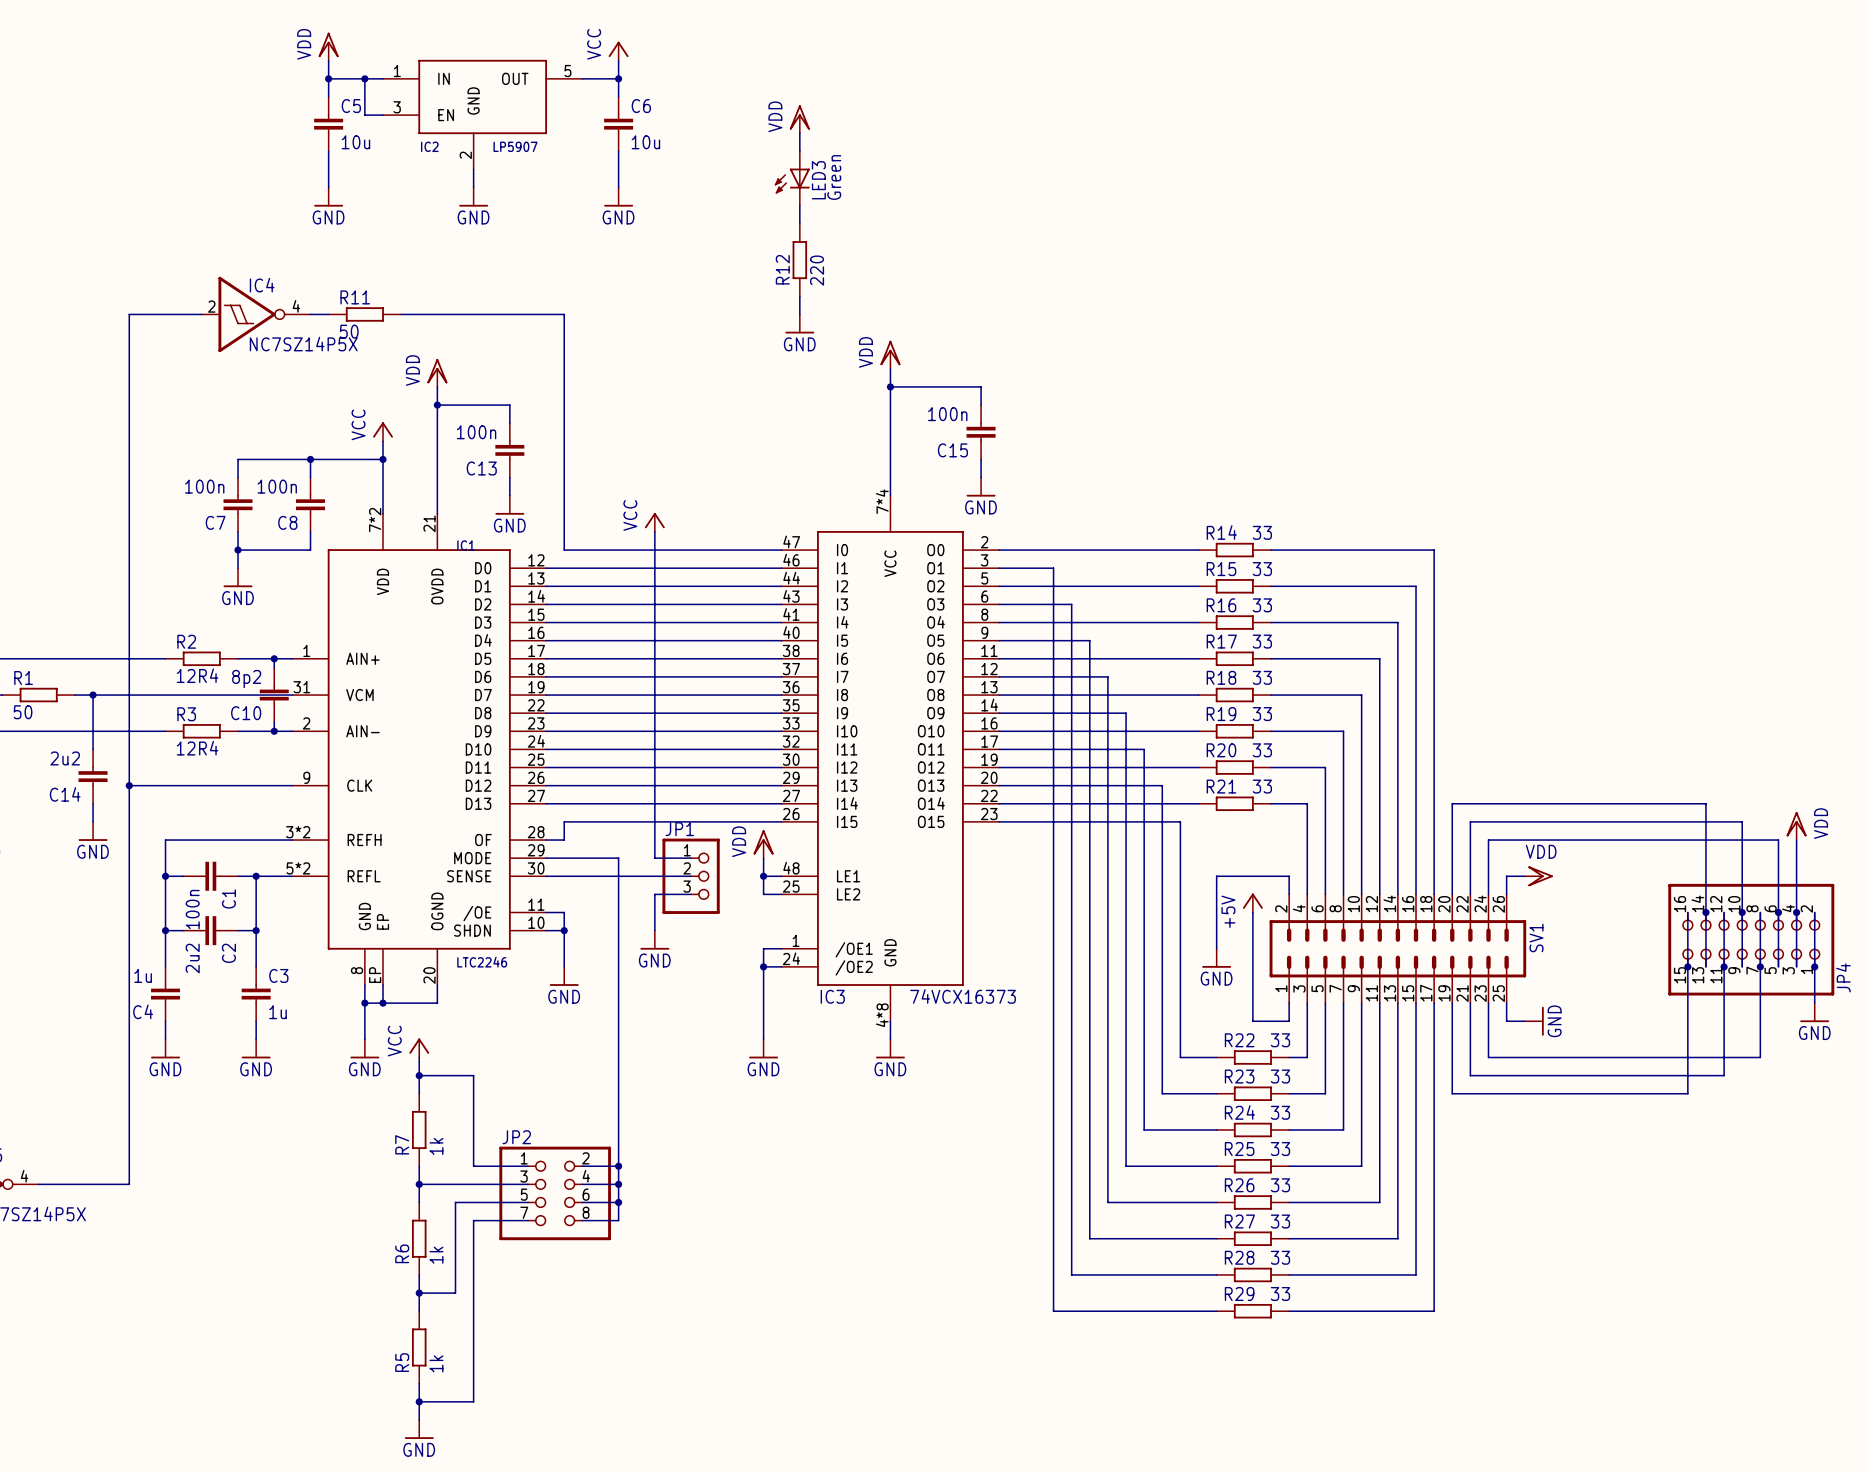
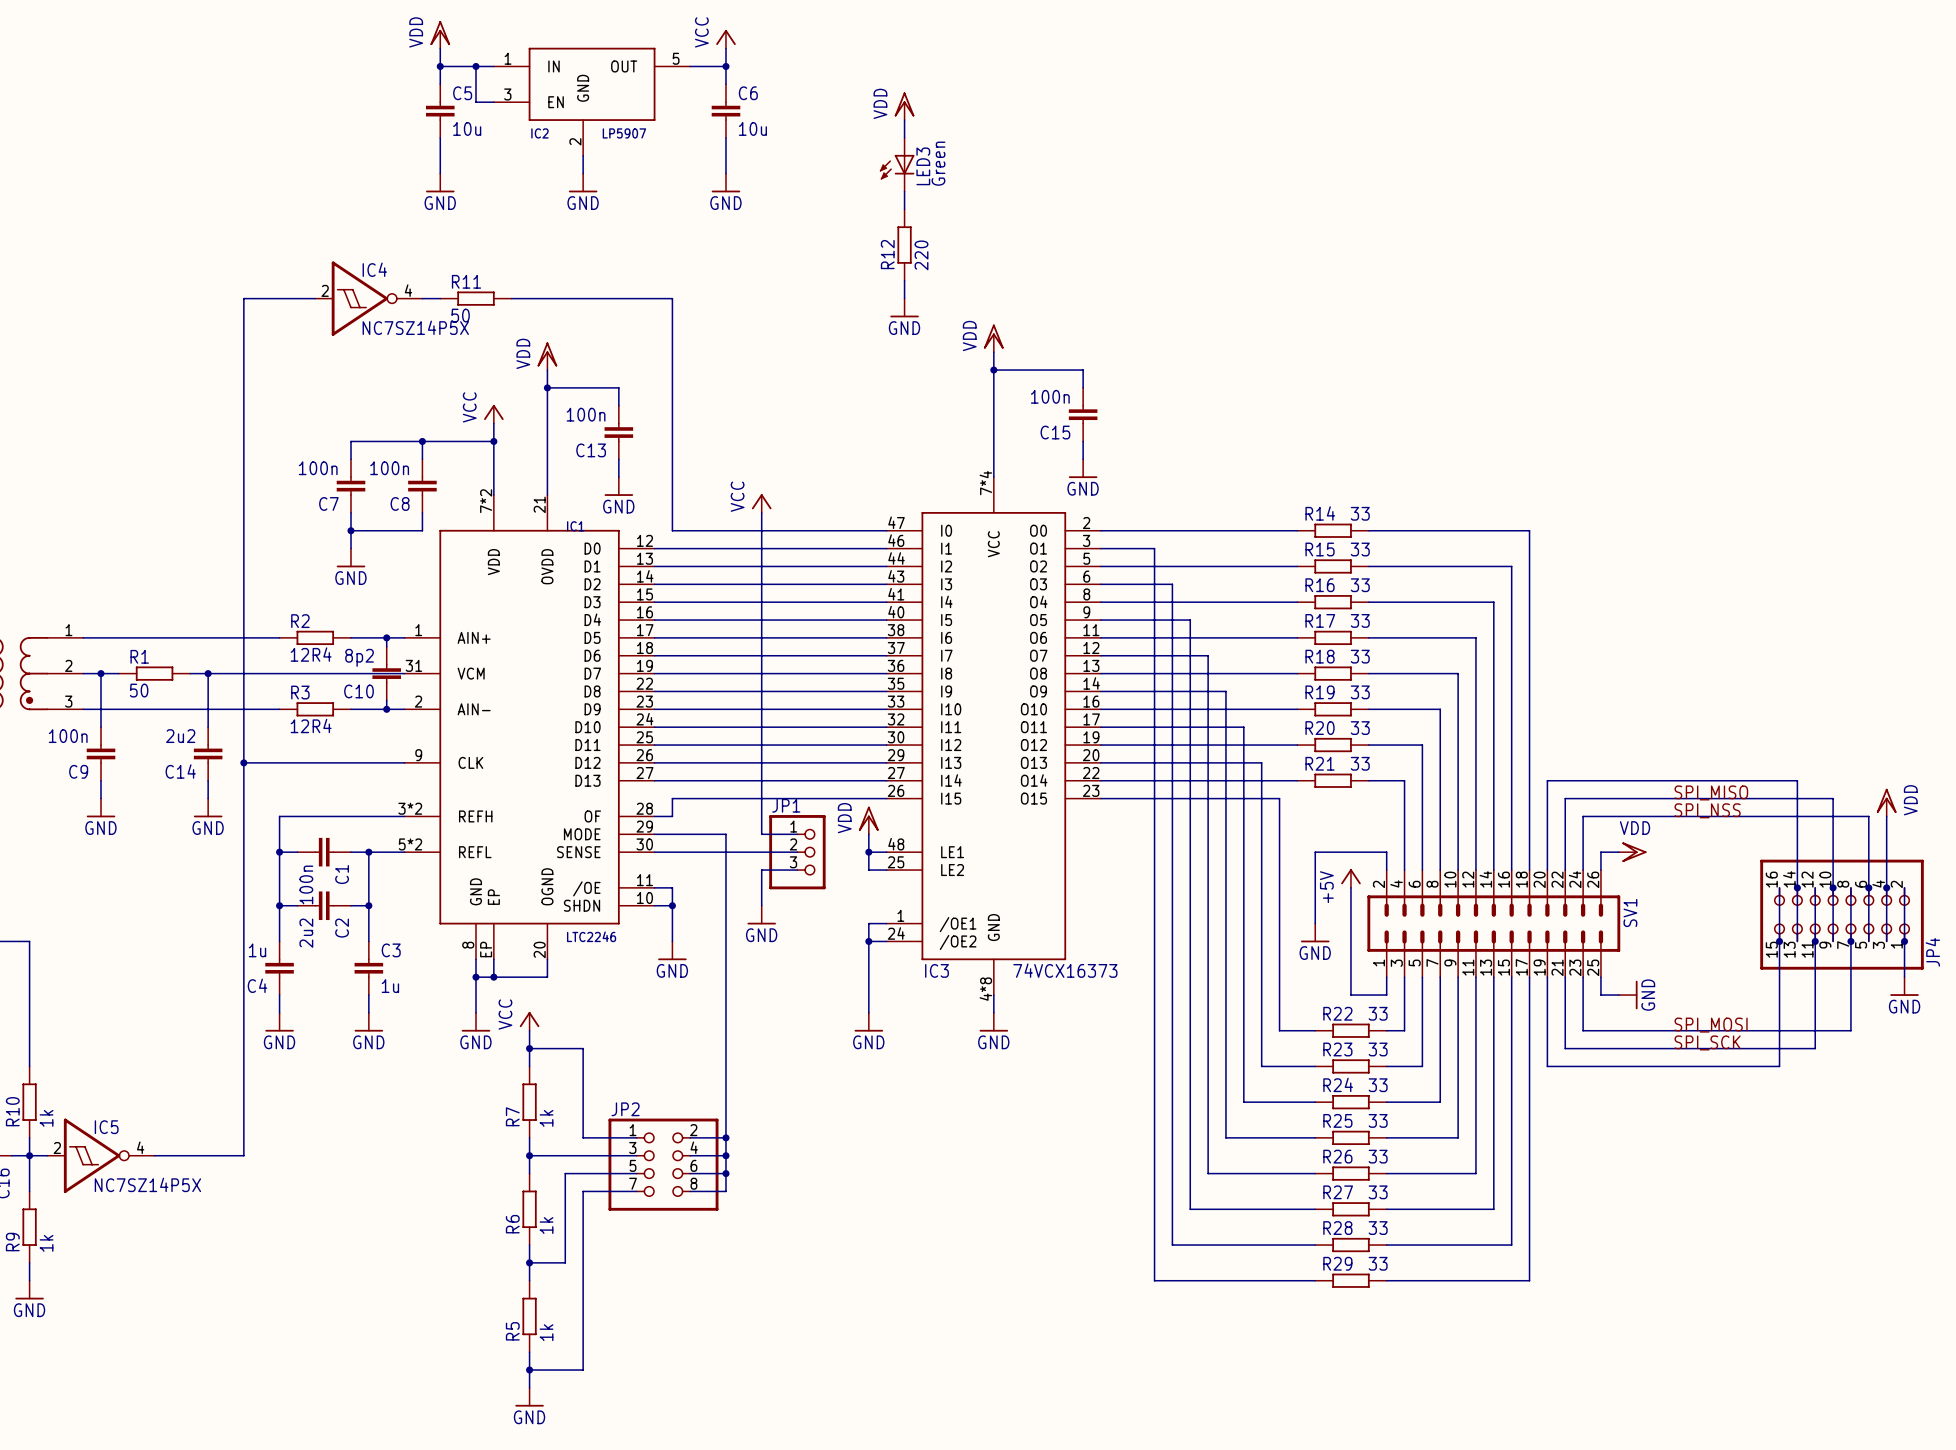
label: none -> SPI_MISO (1711, 792)
label: none -> SPI_NSS (1707, 810)
label: none -> SPI_MOSI (1711, 1025)
label: none -> SPI_SCK (1707, 1042)

